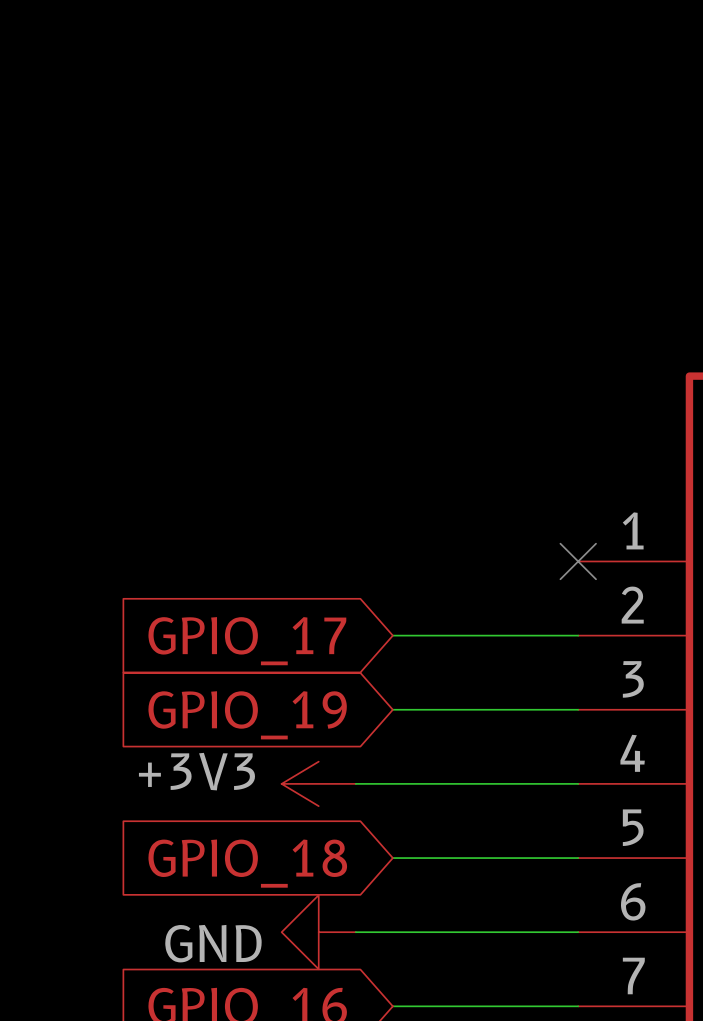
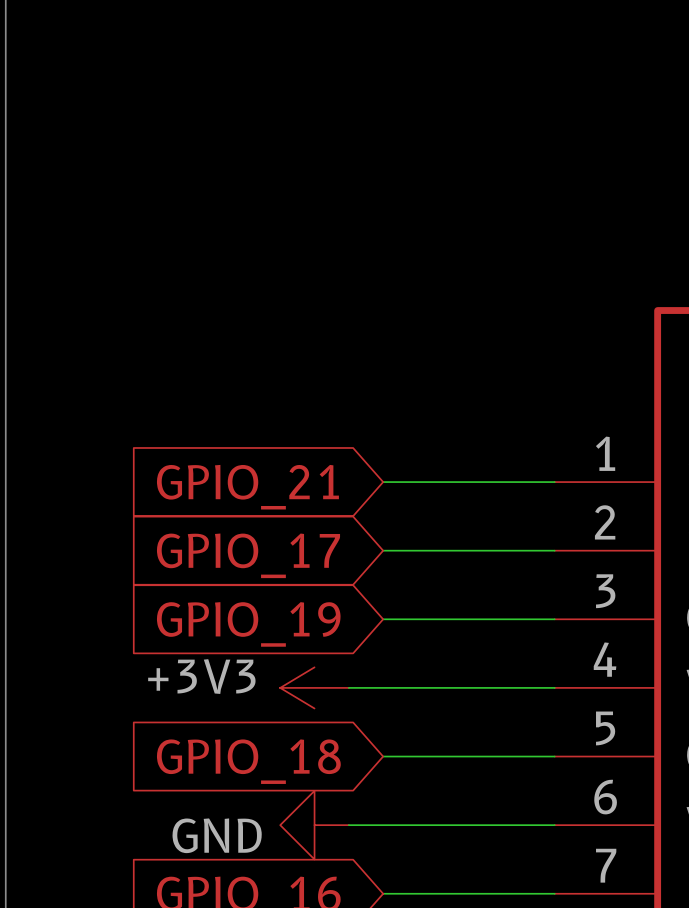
wire: none -> (383, 482) (554, 482)
no-connect mark: (578, 561) -> none
global label: none -> GPIO_21 (247, 487)

